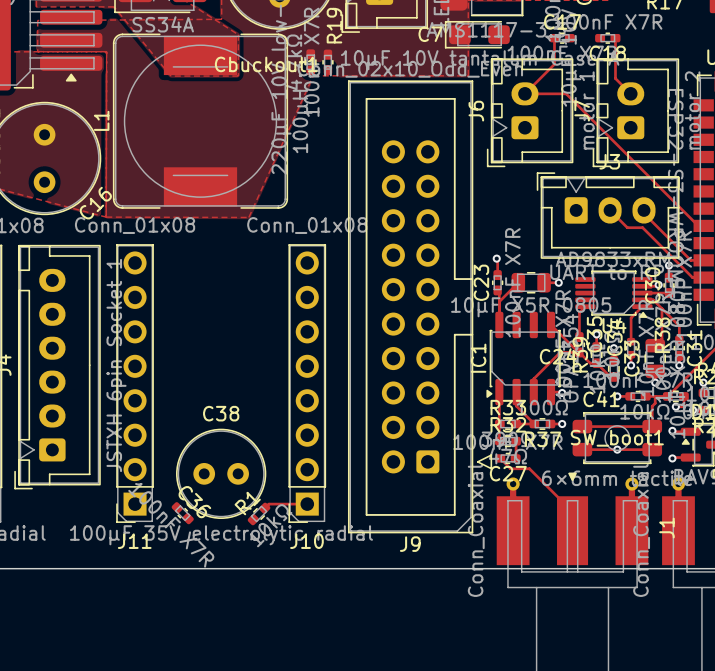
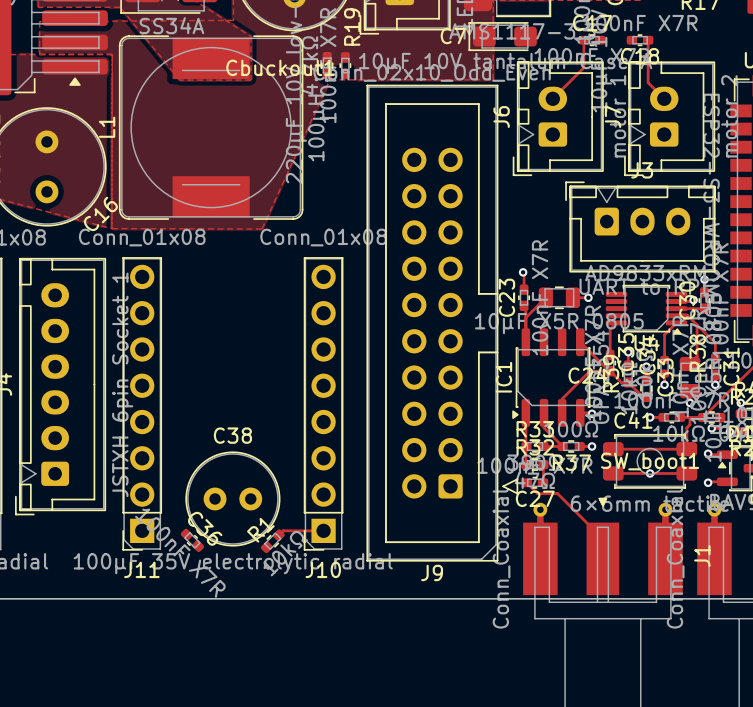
track: (524, 93) (566, 93) (698, 225) (703, 225) -> none
track: (610, 210) (627, 227) (642, 227) (692, 277) (703, 277) -> none
track: (644, 210) (644, 213) (690, 260) (703, 260) -> none

